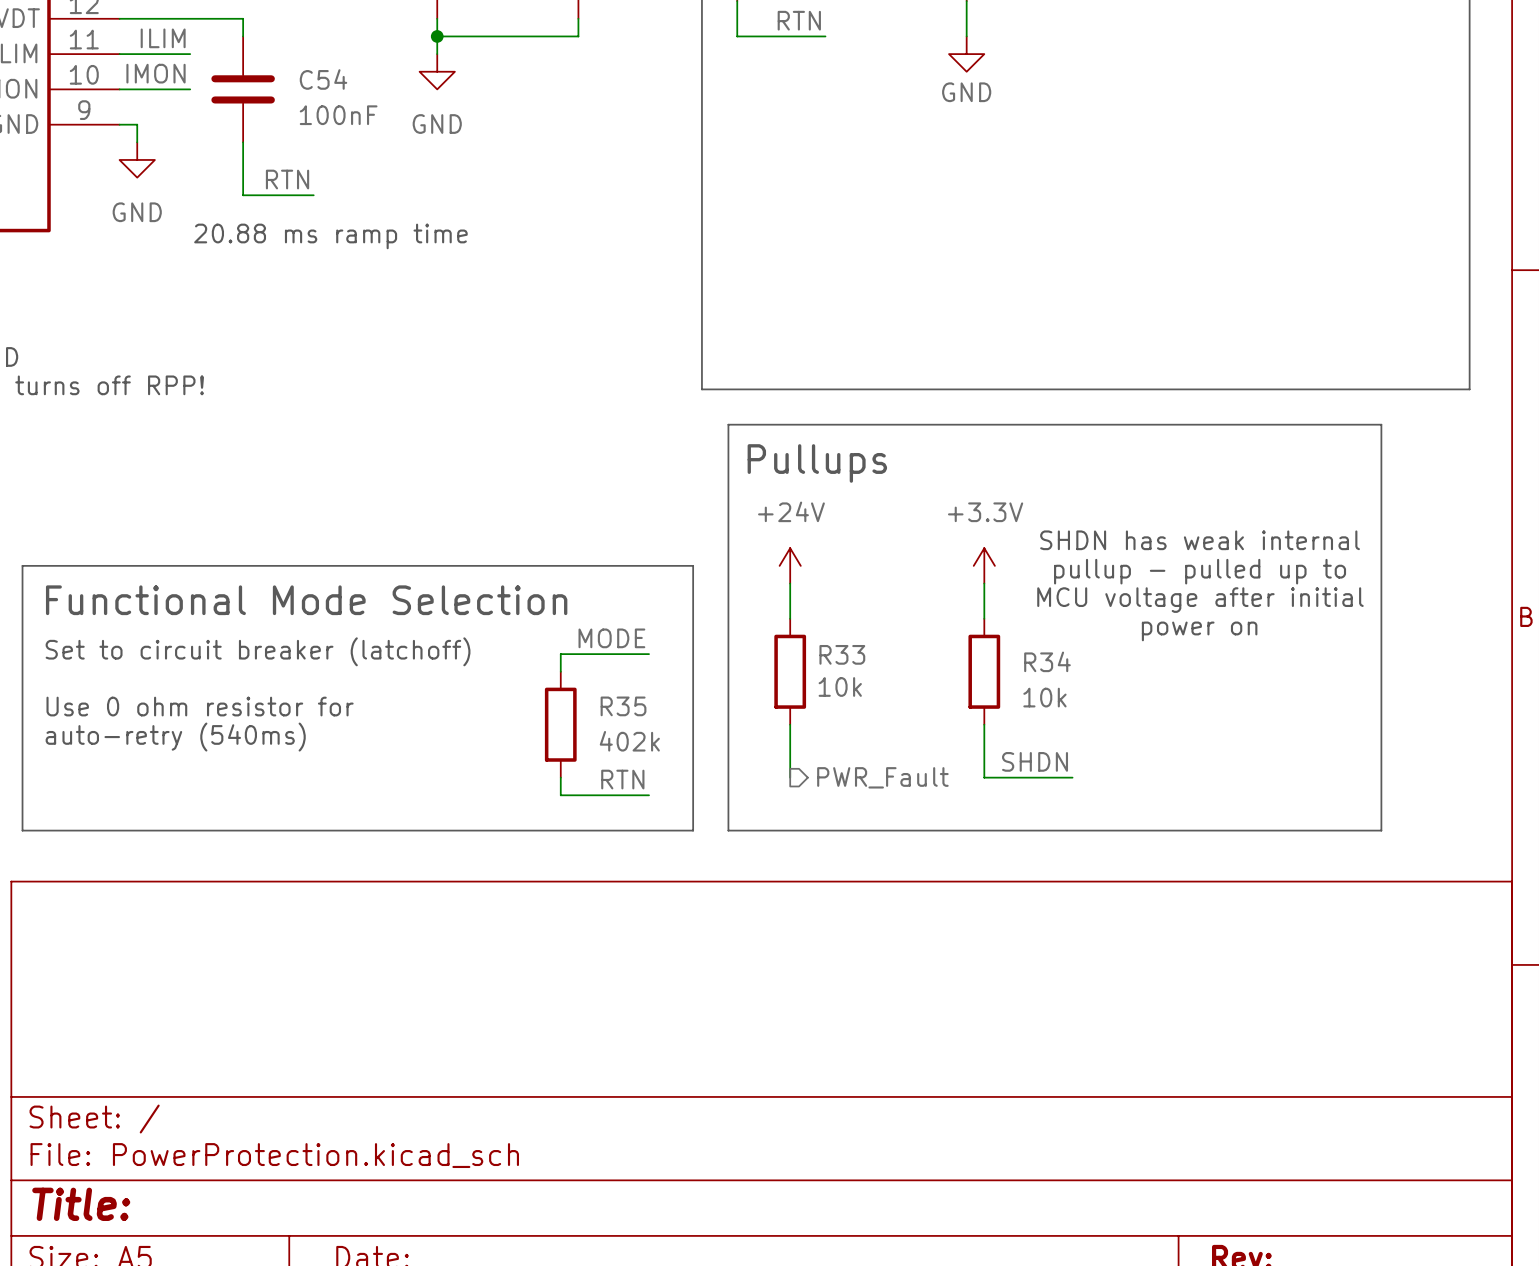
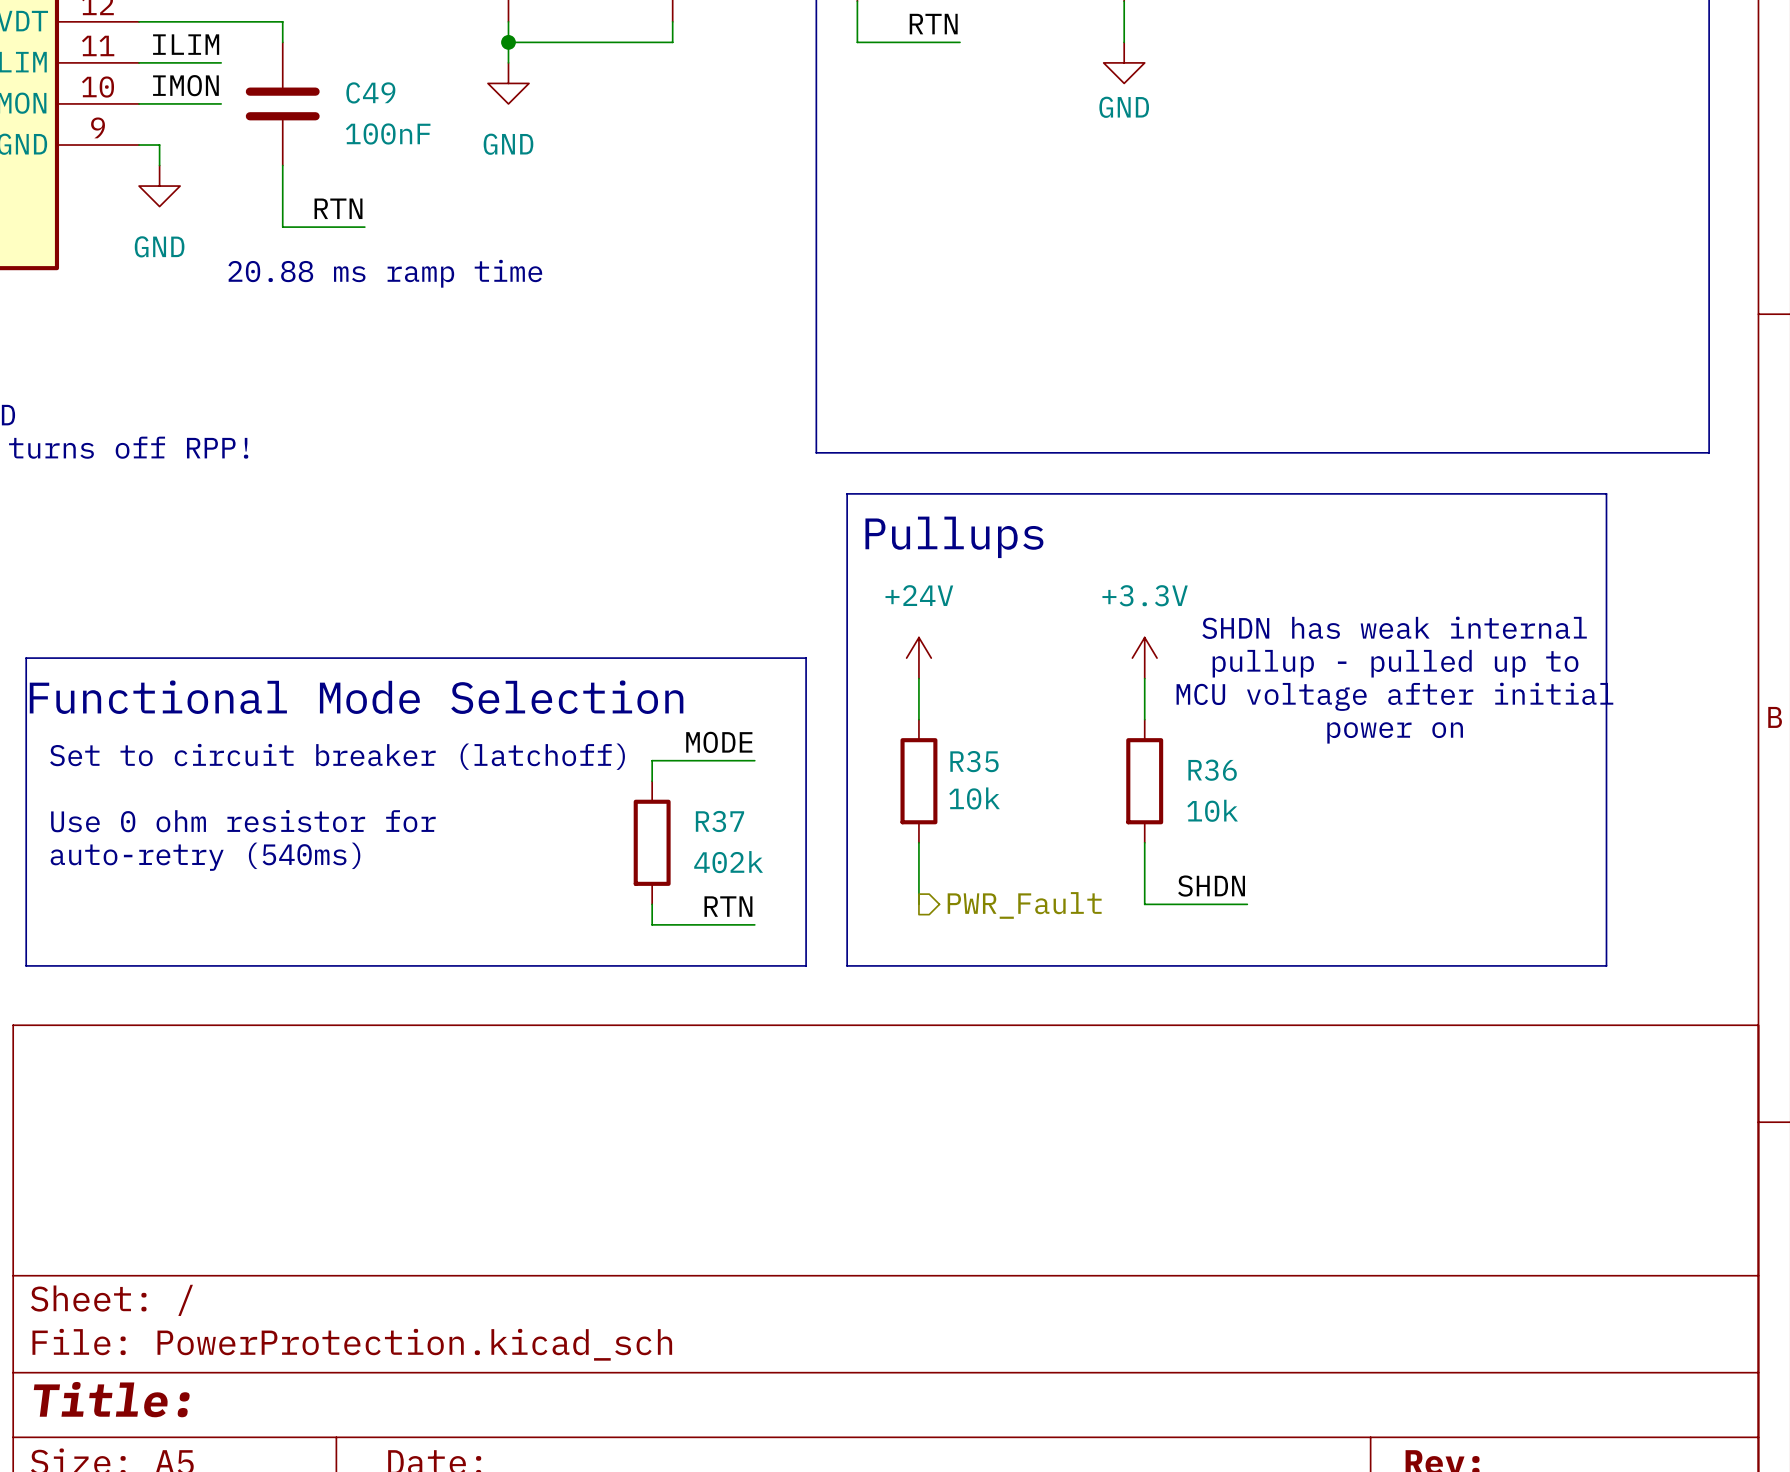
C54 name: C54 (323, 79) -> C49 (370, 92)
R33 name: R33 (842, 654) -> R35 (974, 761)
R34 name: R34 (1047, 661) -> R36 (1212, 770)
R35 name: R35 (623, 706) -> R37 (719, 821)

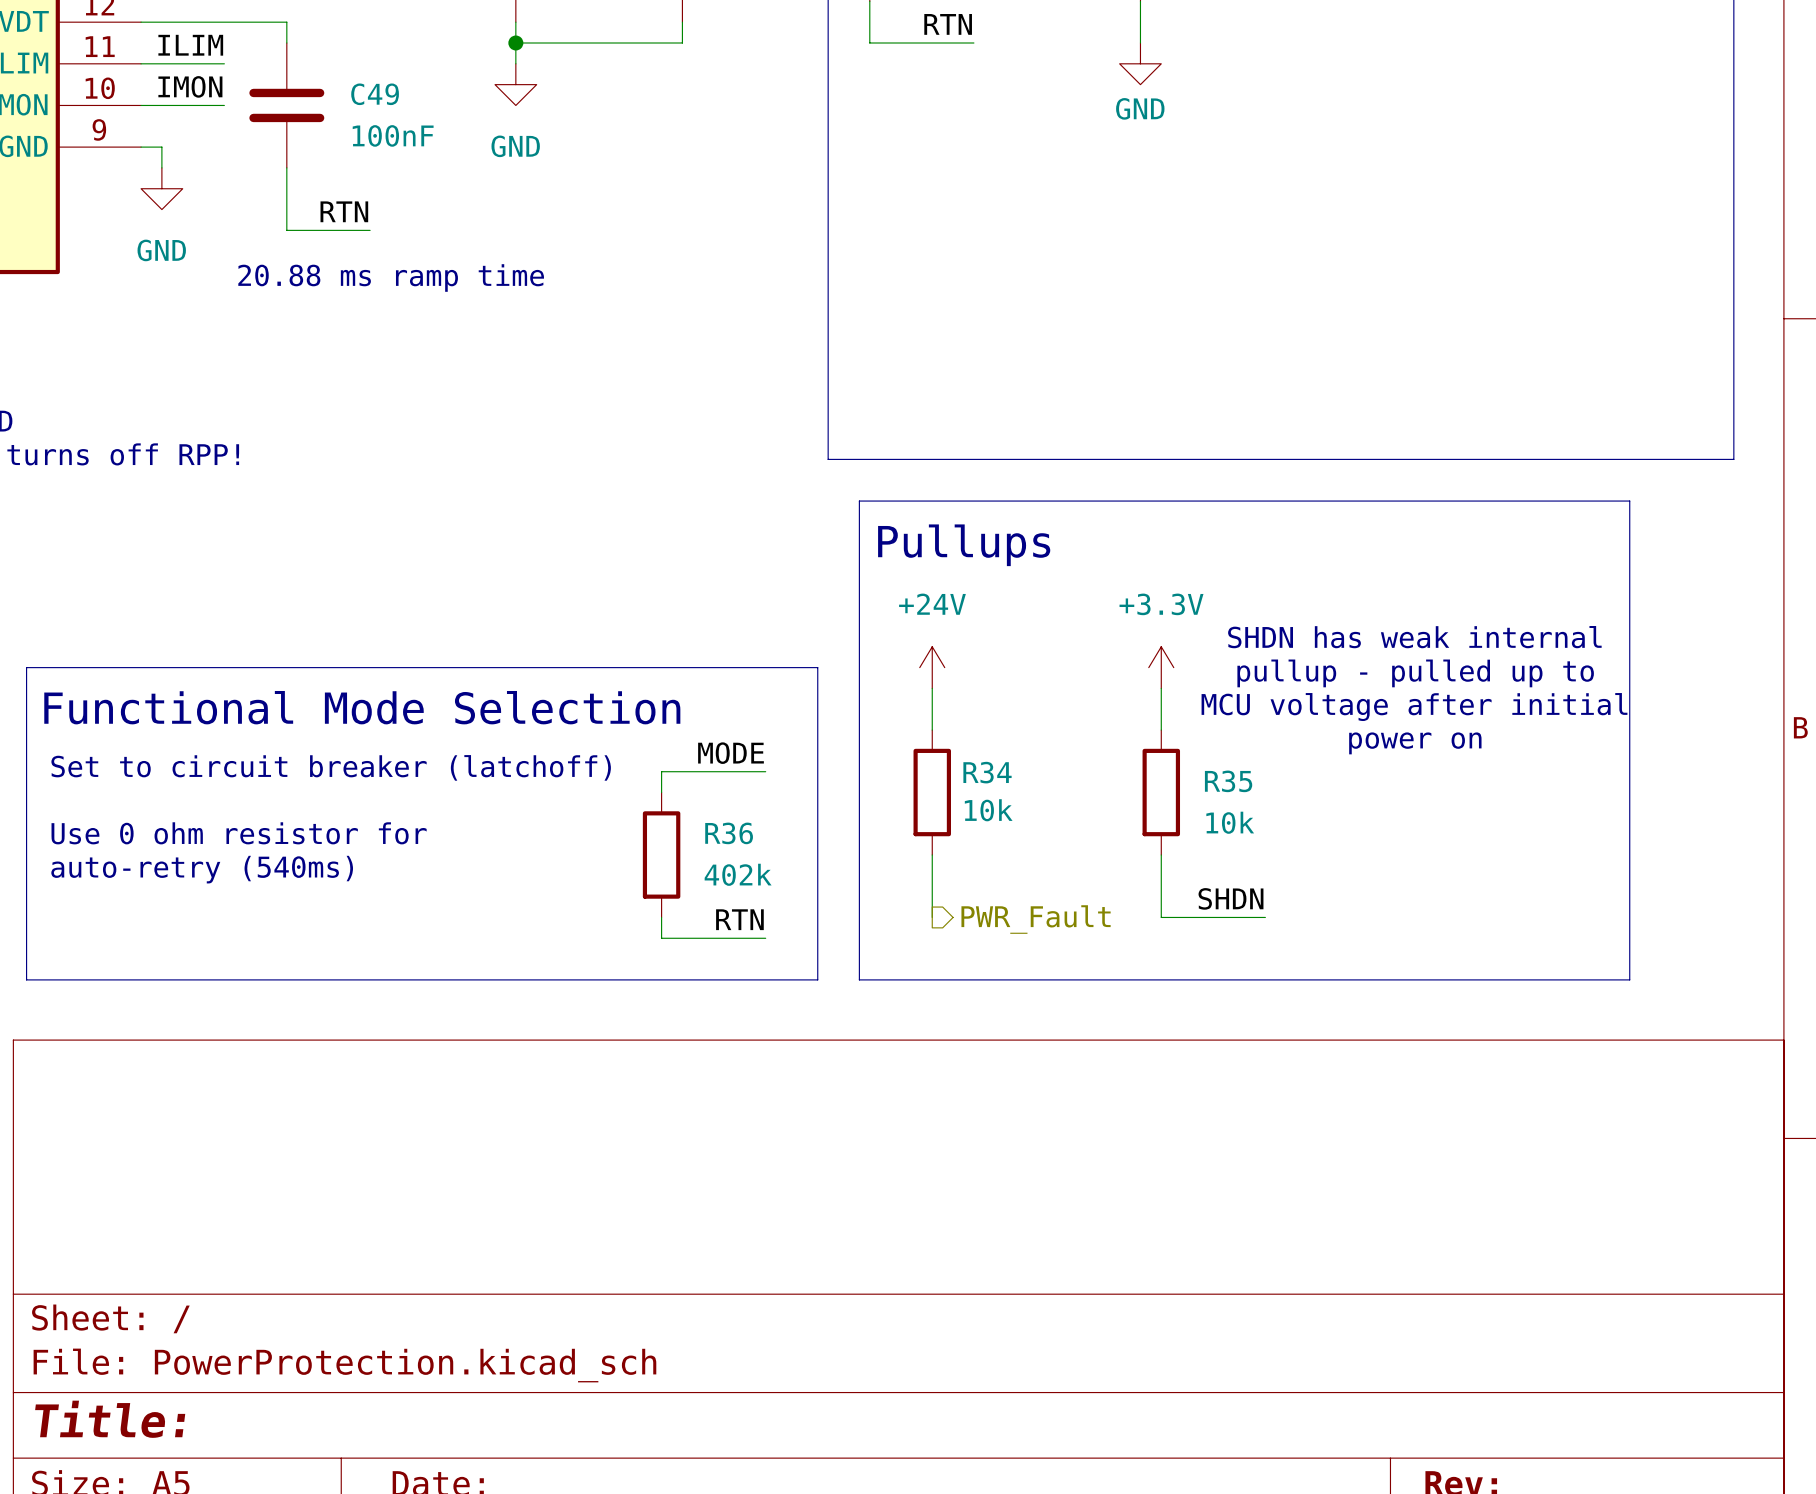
R35 name: R35 (974, 761) -> R34 (987, 772)
R36 name: R36 (1212, 770) -> R35 (1228, 781)
R37 name: R37 (719, 821) -> R36 (729, 833)

